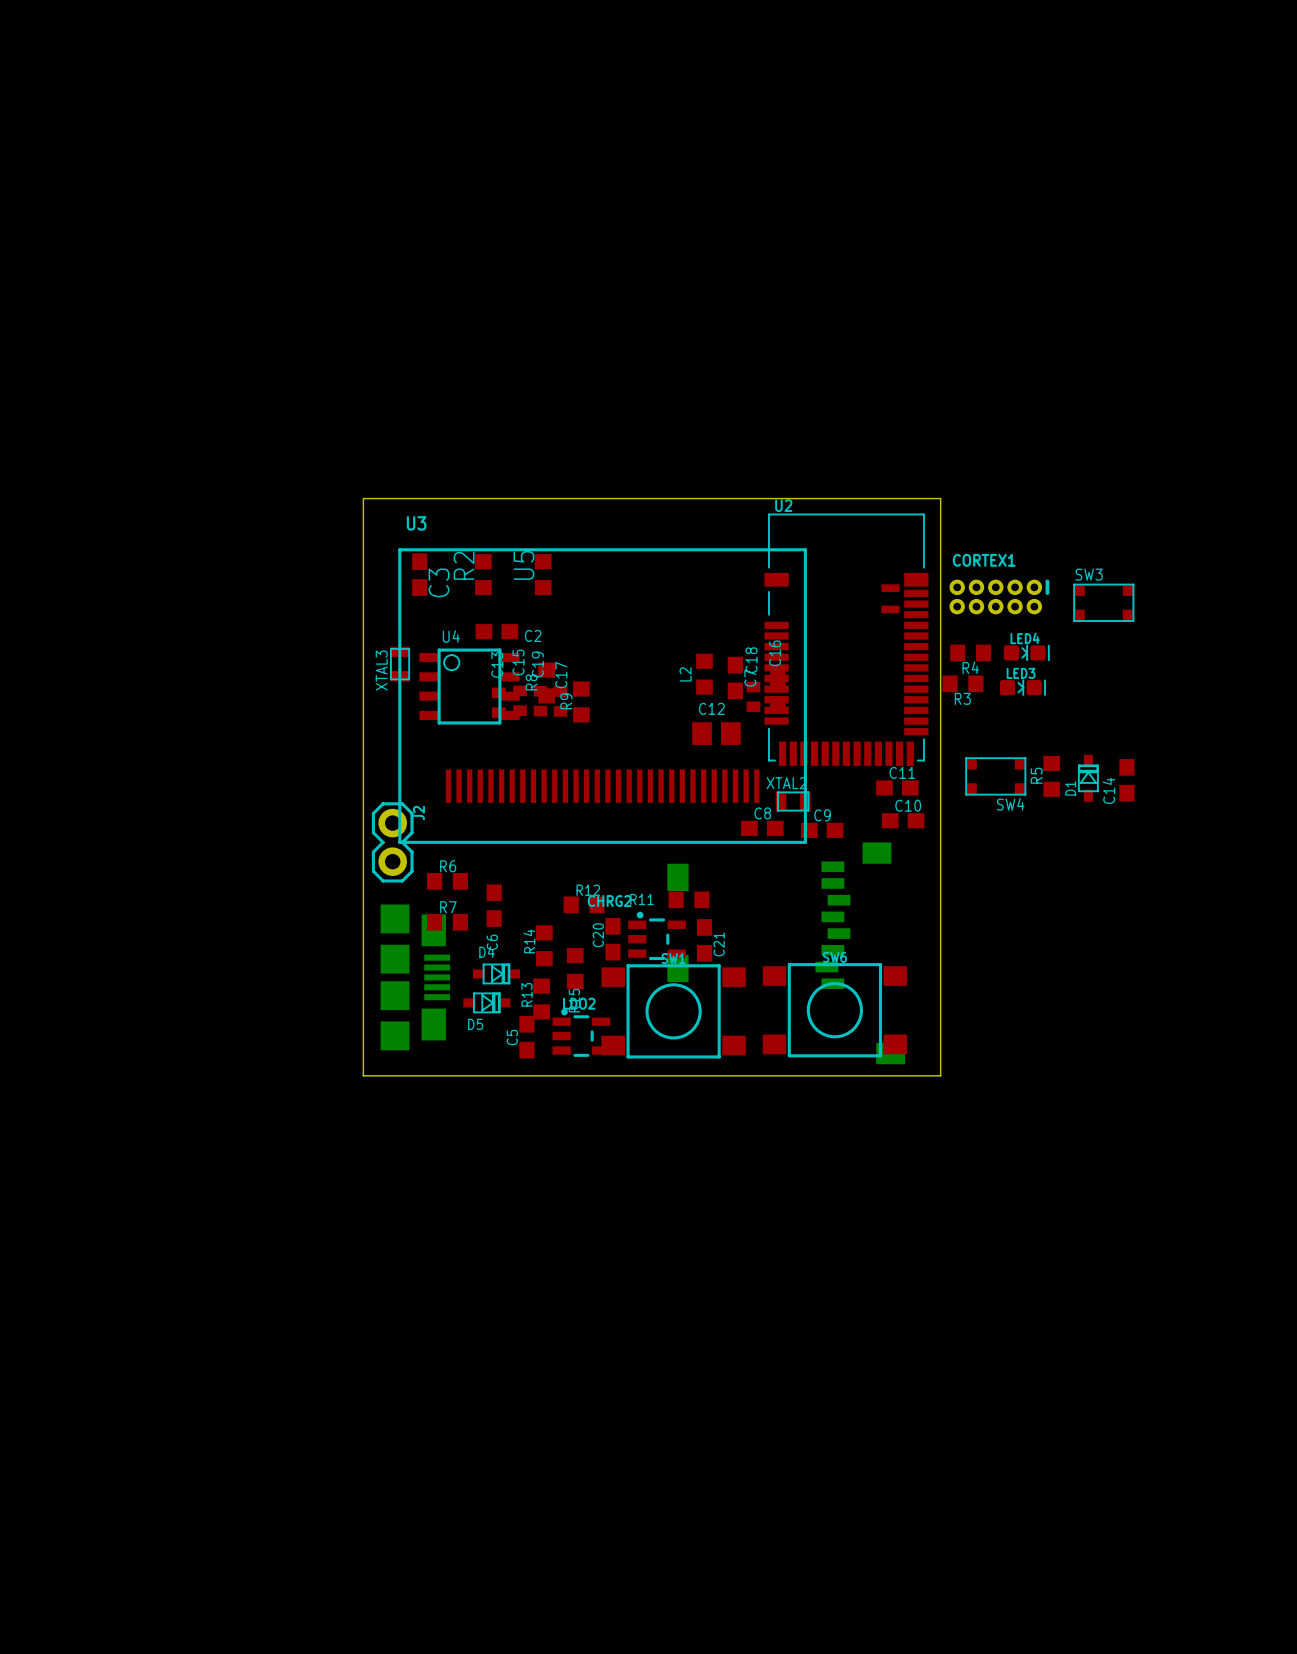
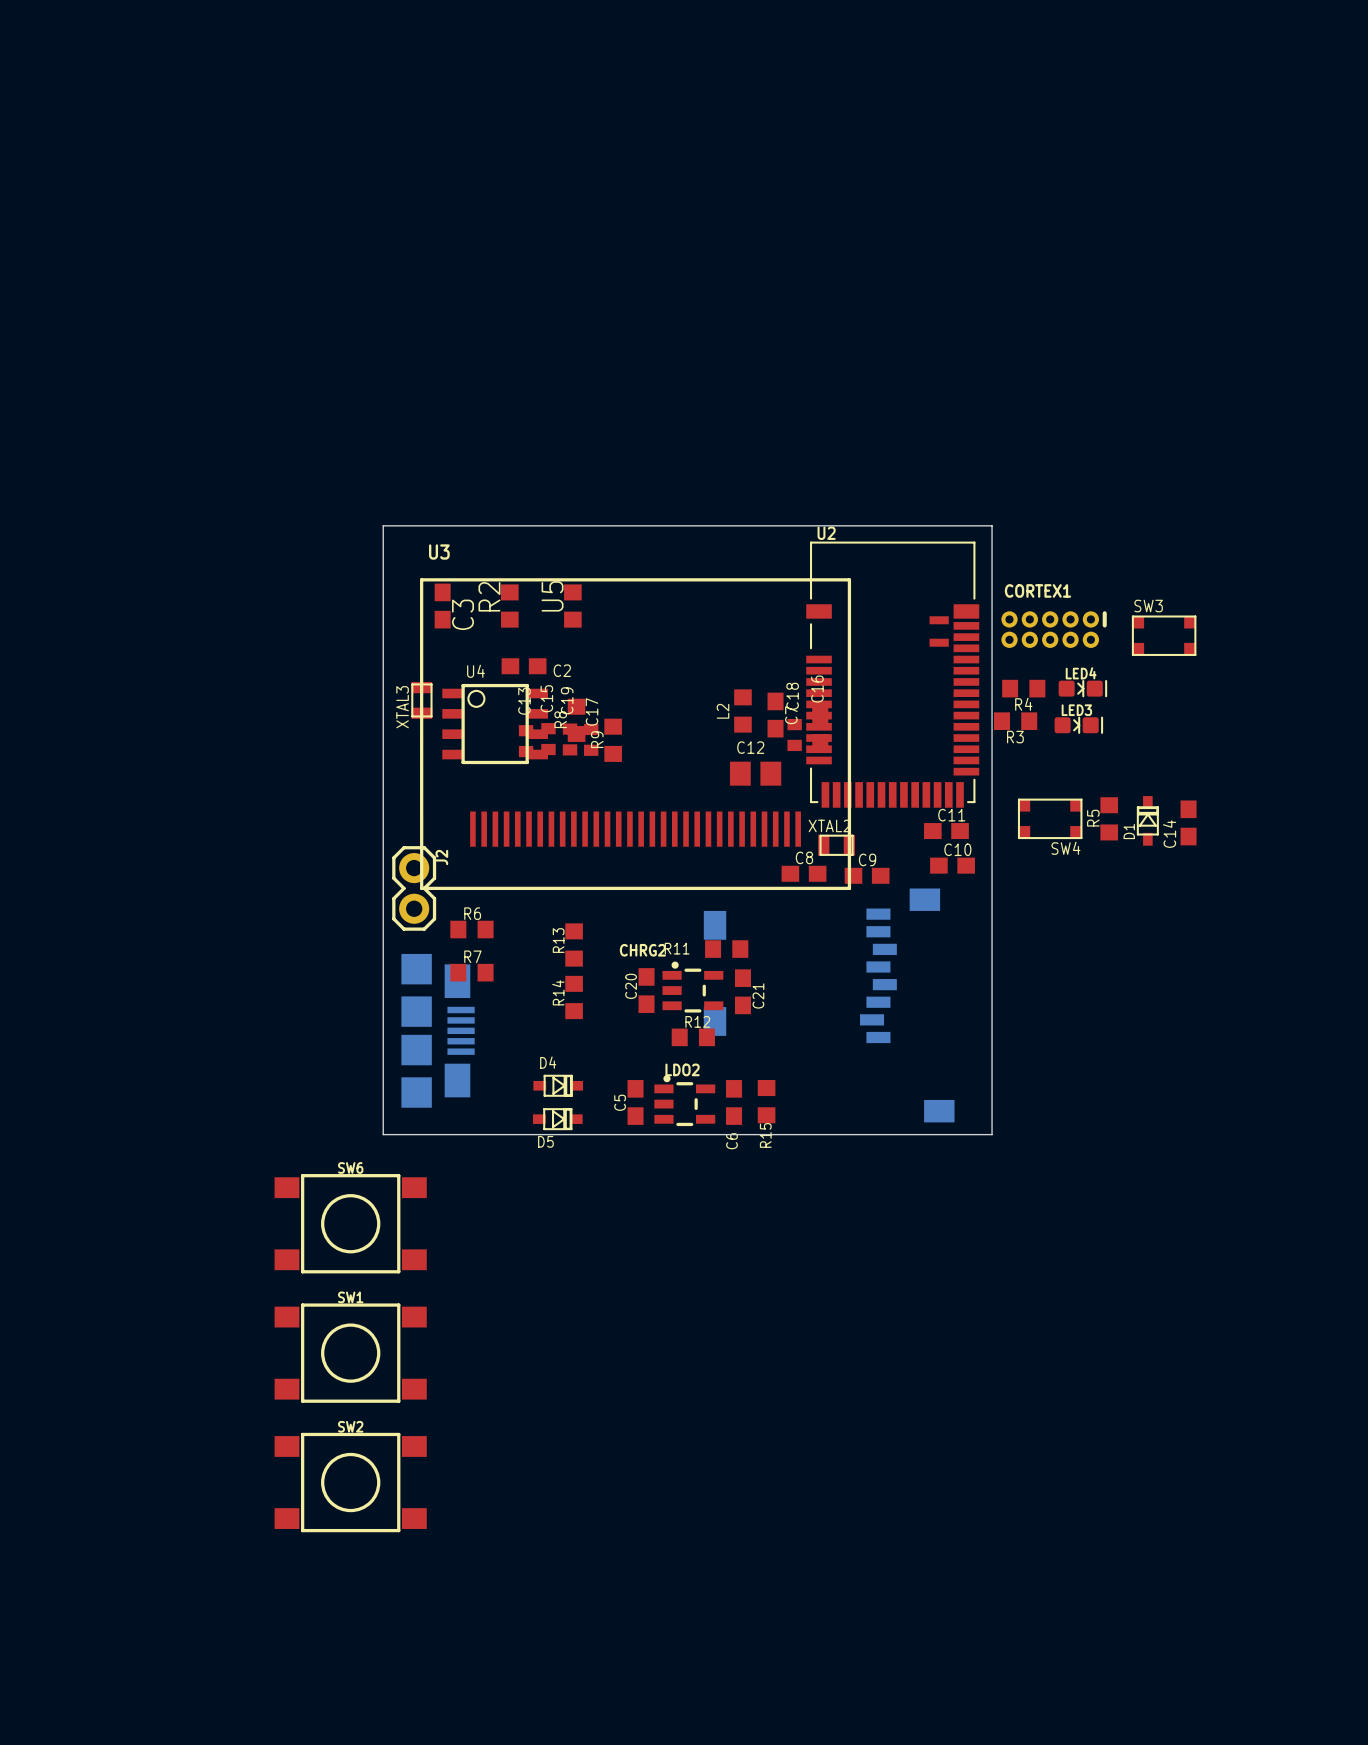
R12 position: (584, 904) -> (693, 1037)
C6 position: (494, 905) -> (734, 1102)
R15 position: (575, 968) -> (766, 1101)
D4 position: (496, 973) -> (558, 1085)
R13 position: (541, 999) -> (574, 944)
D5 position: (486, 1002) -> (557, 1119)
SW6 position: (834, 1010) -> (350, 1223)
SW1 position: (673, 1011) -> (350, 1353)
LDO2 position: (581, 1032) -> (684, 1100)
C5 position: (526, 1037) -> (635, 1102)
SW2: none -> (350, 1482)

